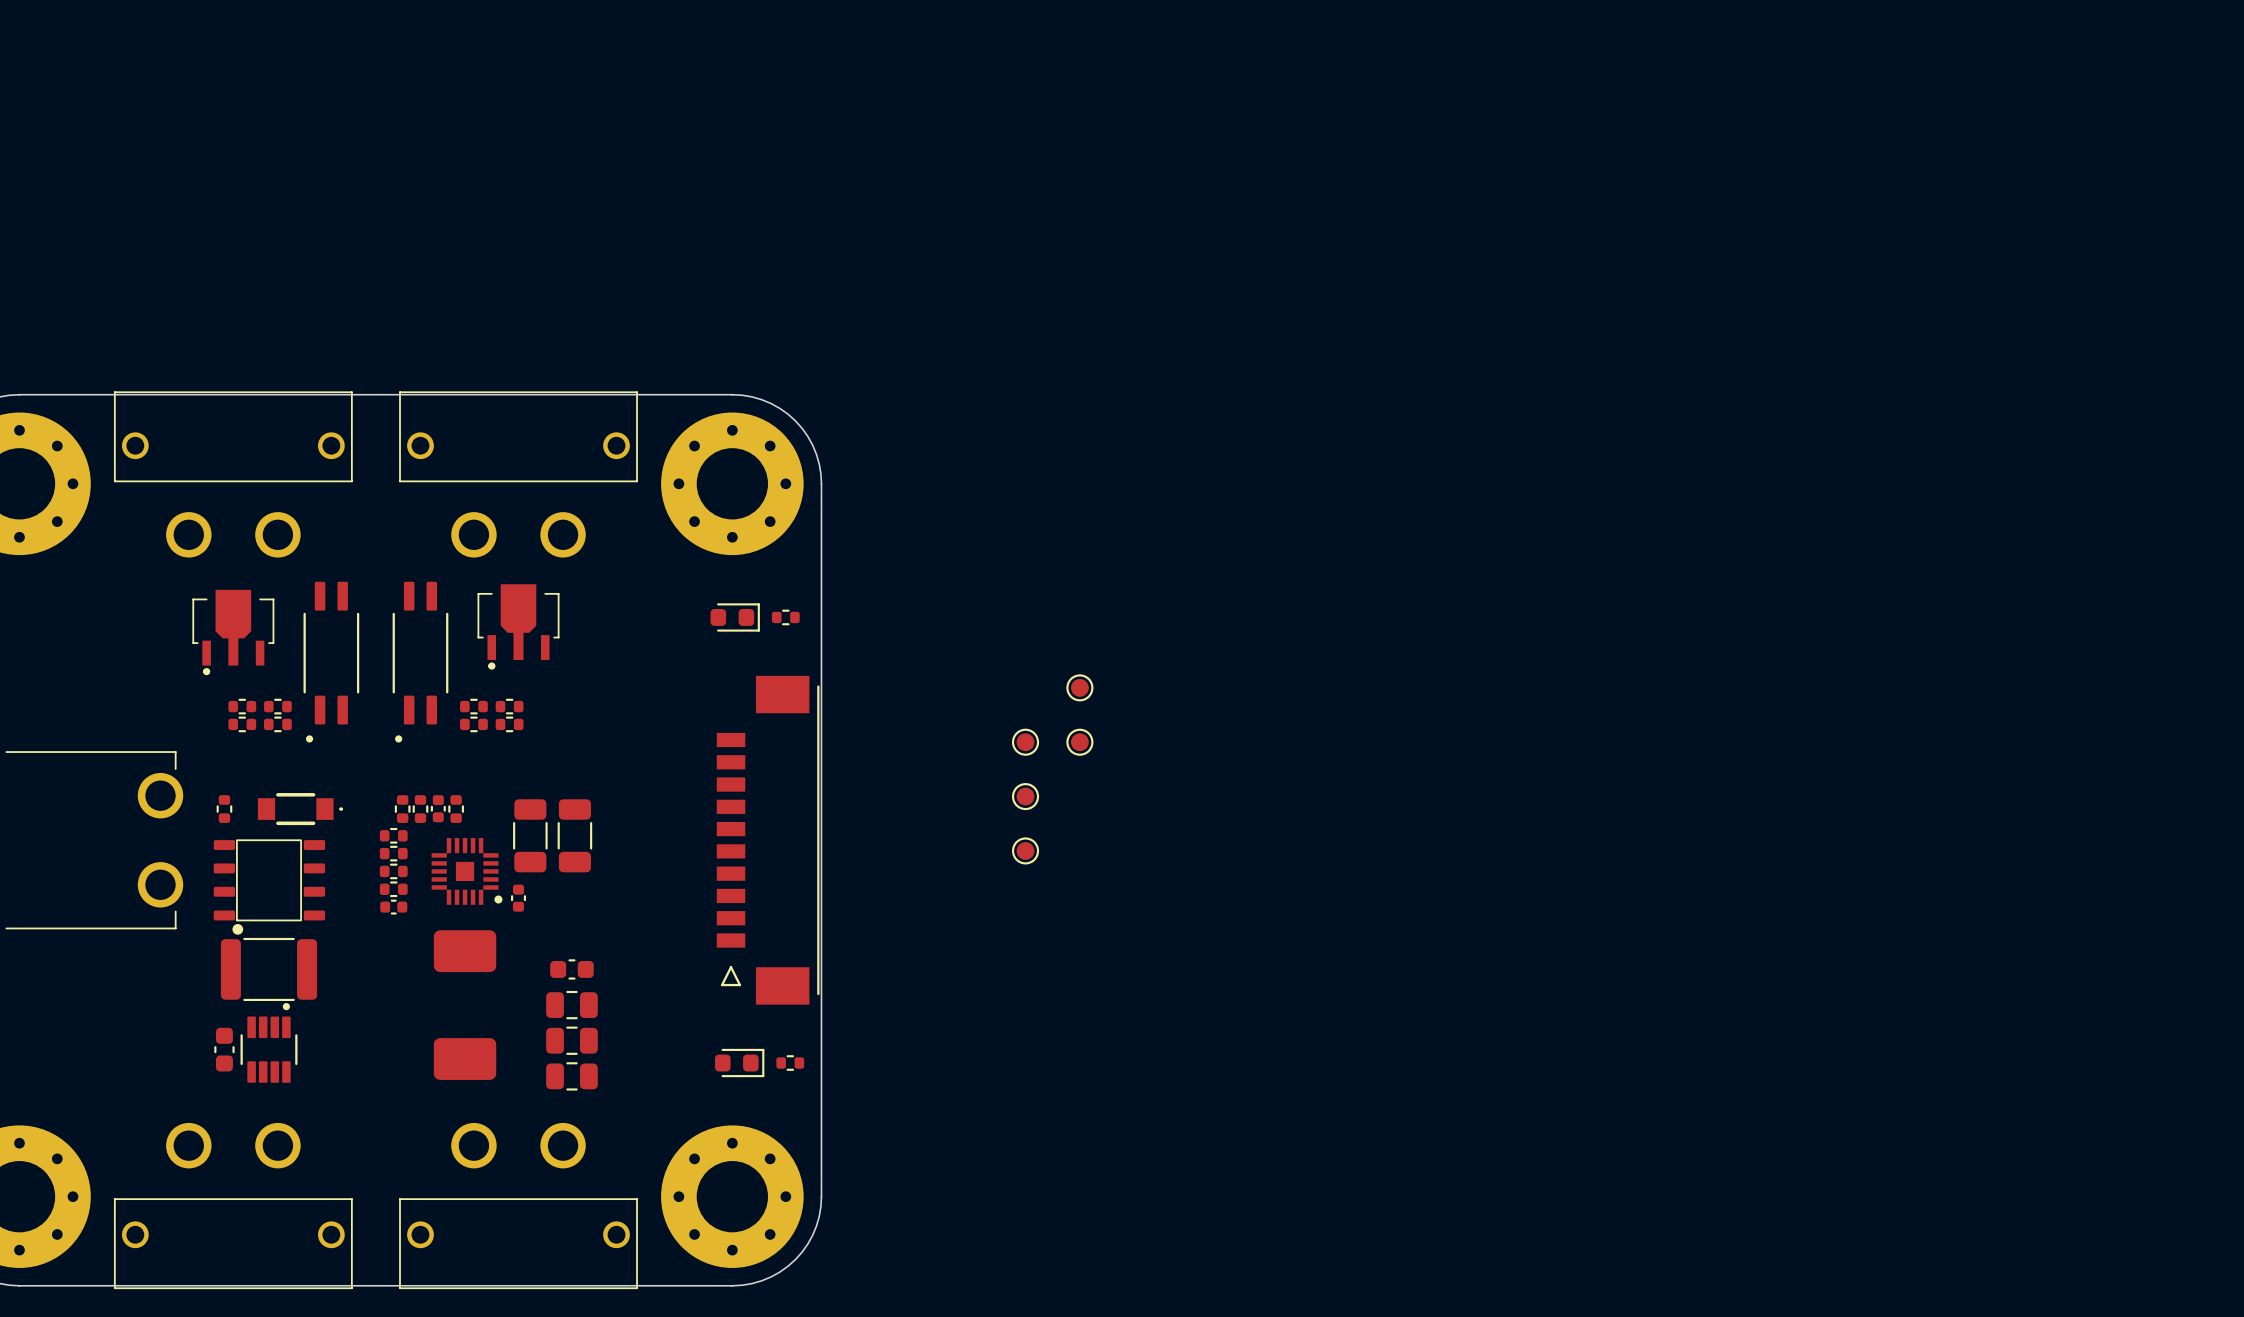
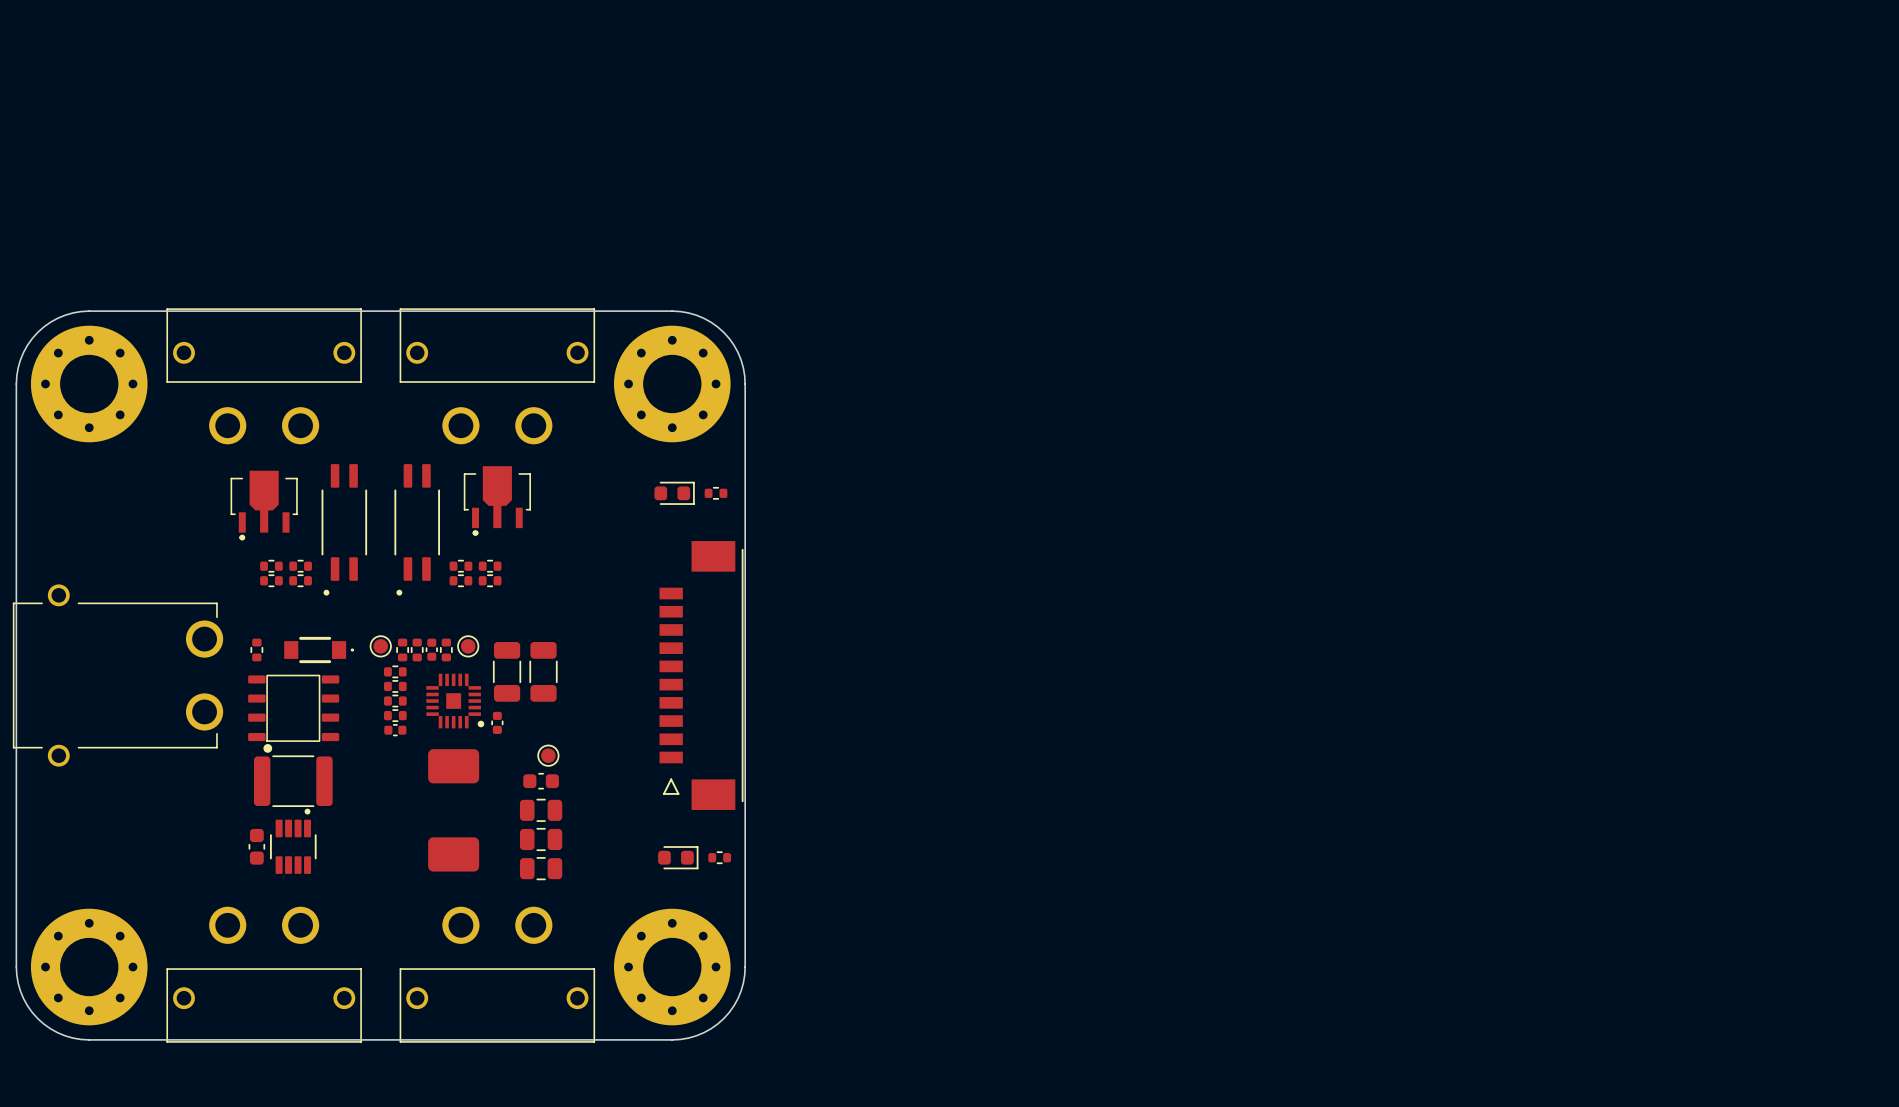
part: (1079, 687) -> none
part: (1025, 742) -> none
part: (1079, 742) -> none
part: (1025, 796) -> none
part: none -> (380, 646)
part: none -> (468, 646)
part: (1025, 850) -> none
part: none -> (548, 755)

